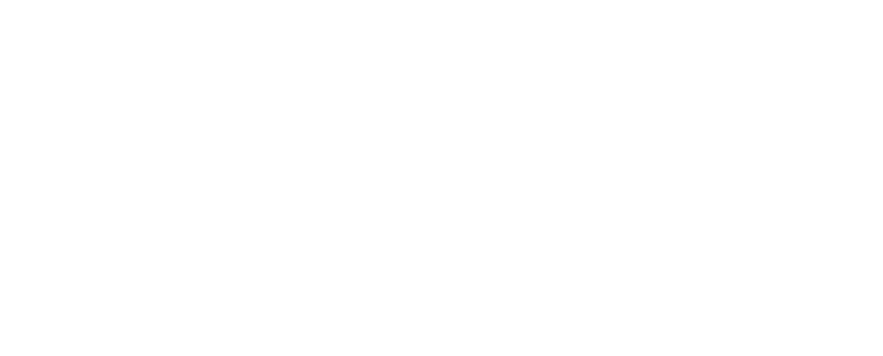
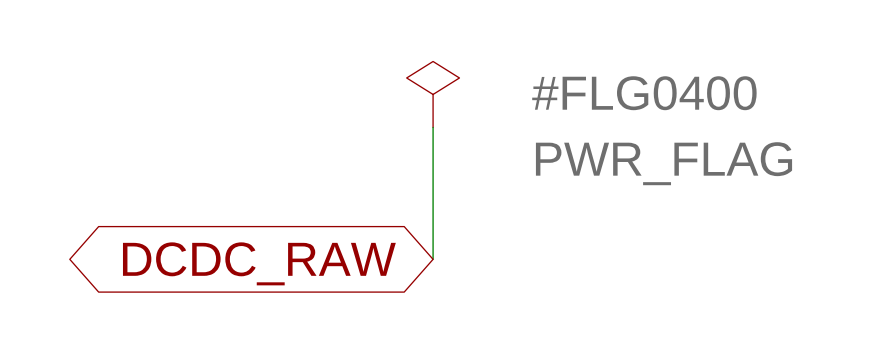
#FLG0400: none -> PWR_FLAG (433, 94)
wire: none -> (433, 127) (433, 259)
global label: none -> DCDC_RAW (259, 263)

